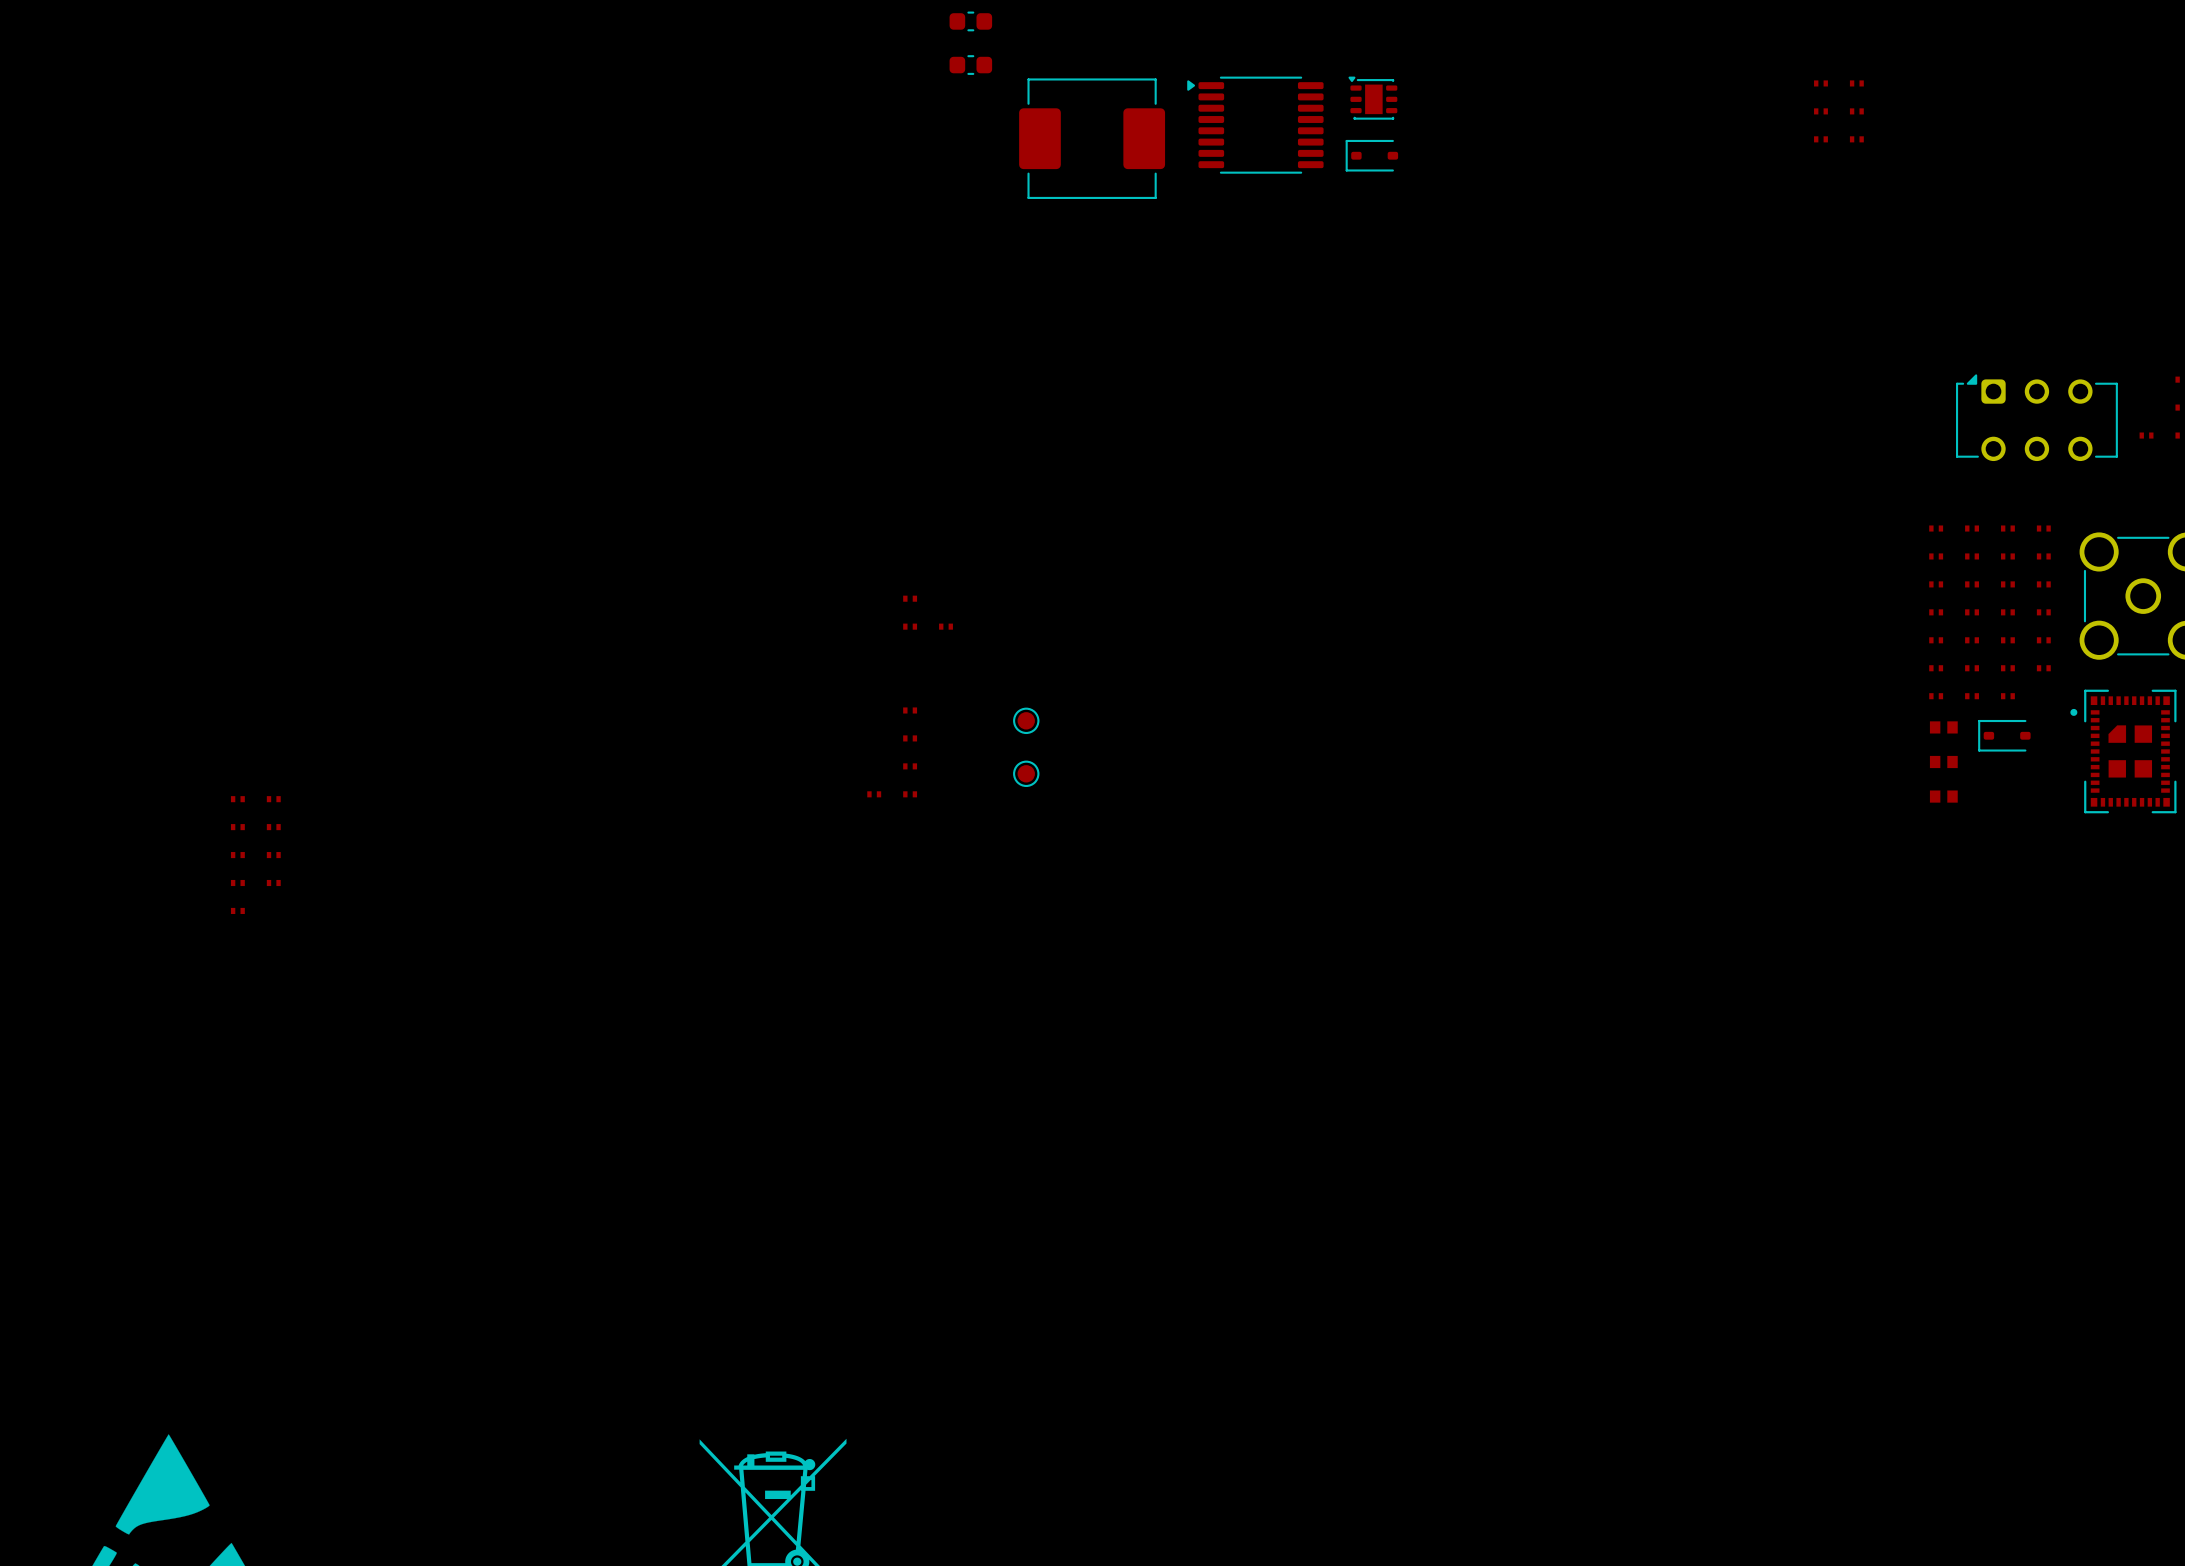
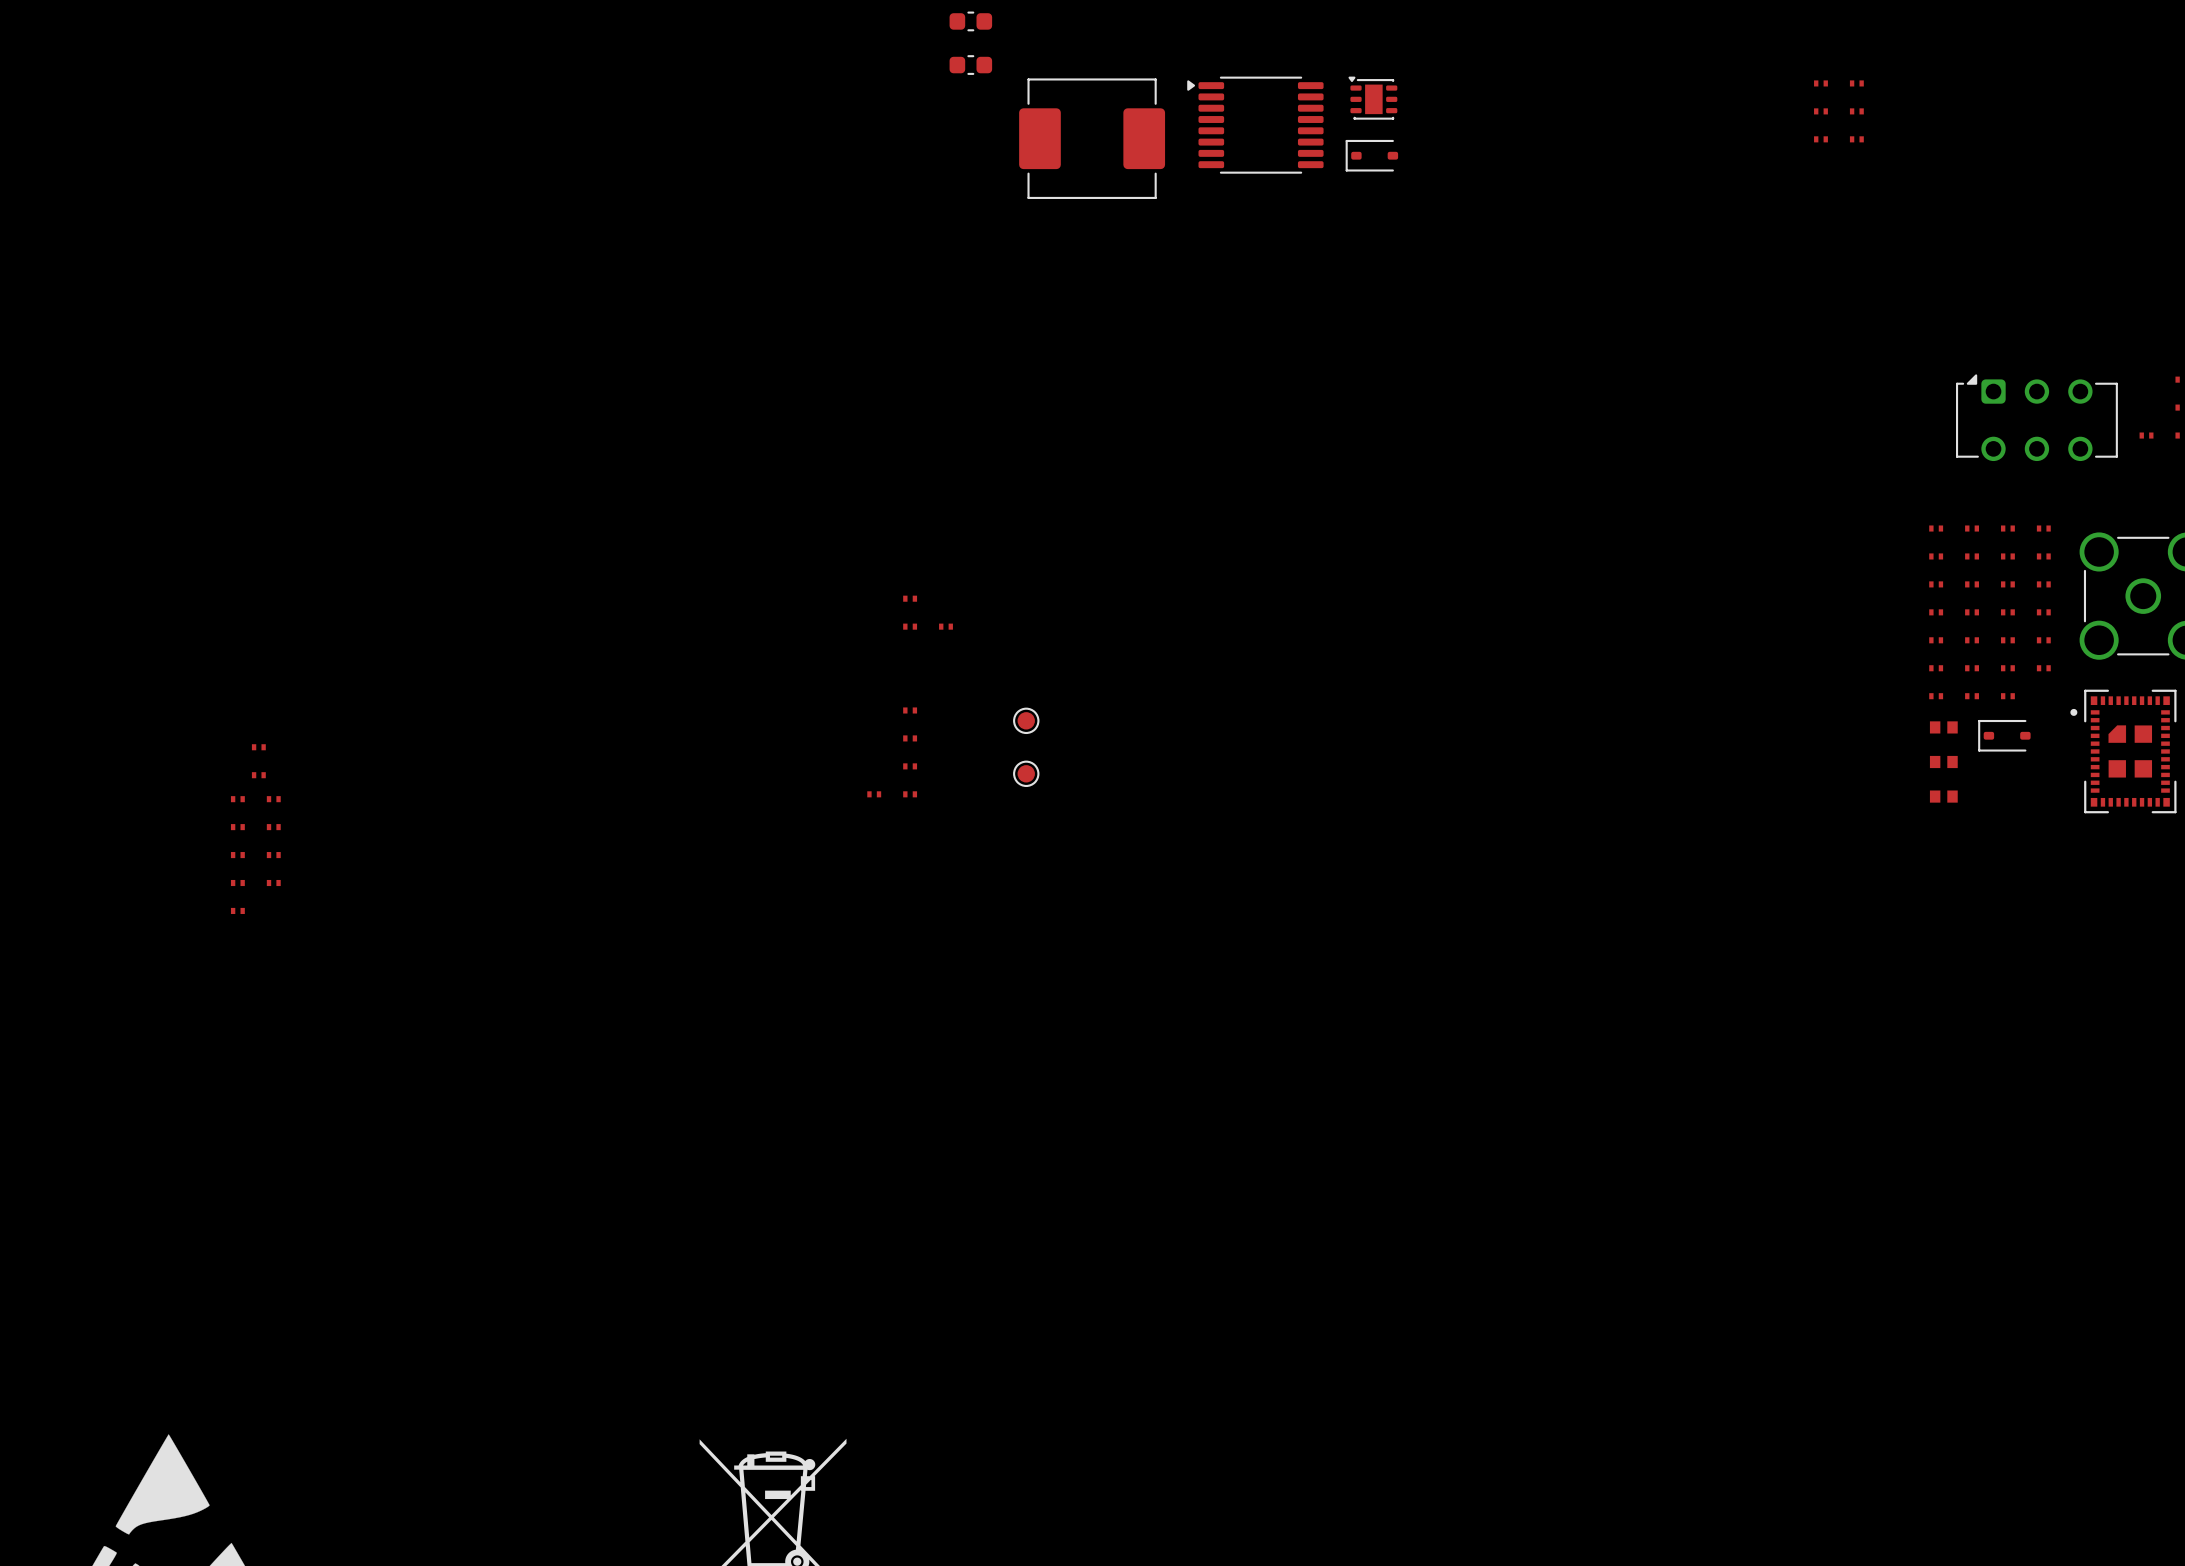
part: none -> (258, 747)
part: none -> (258, 775)

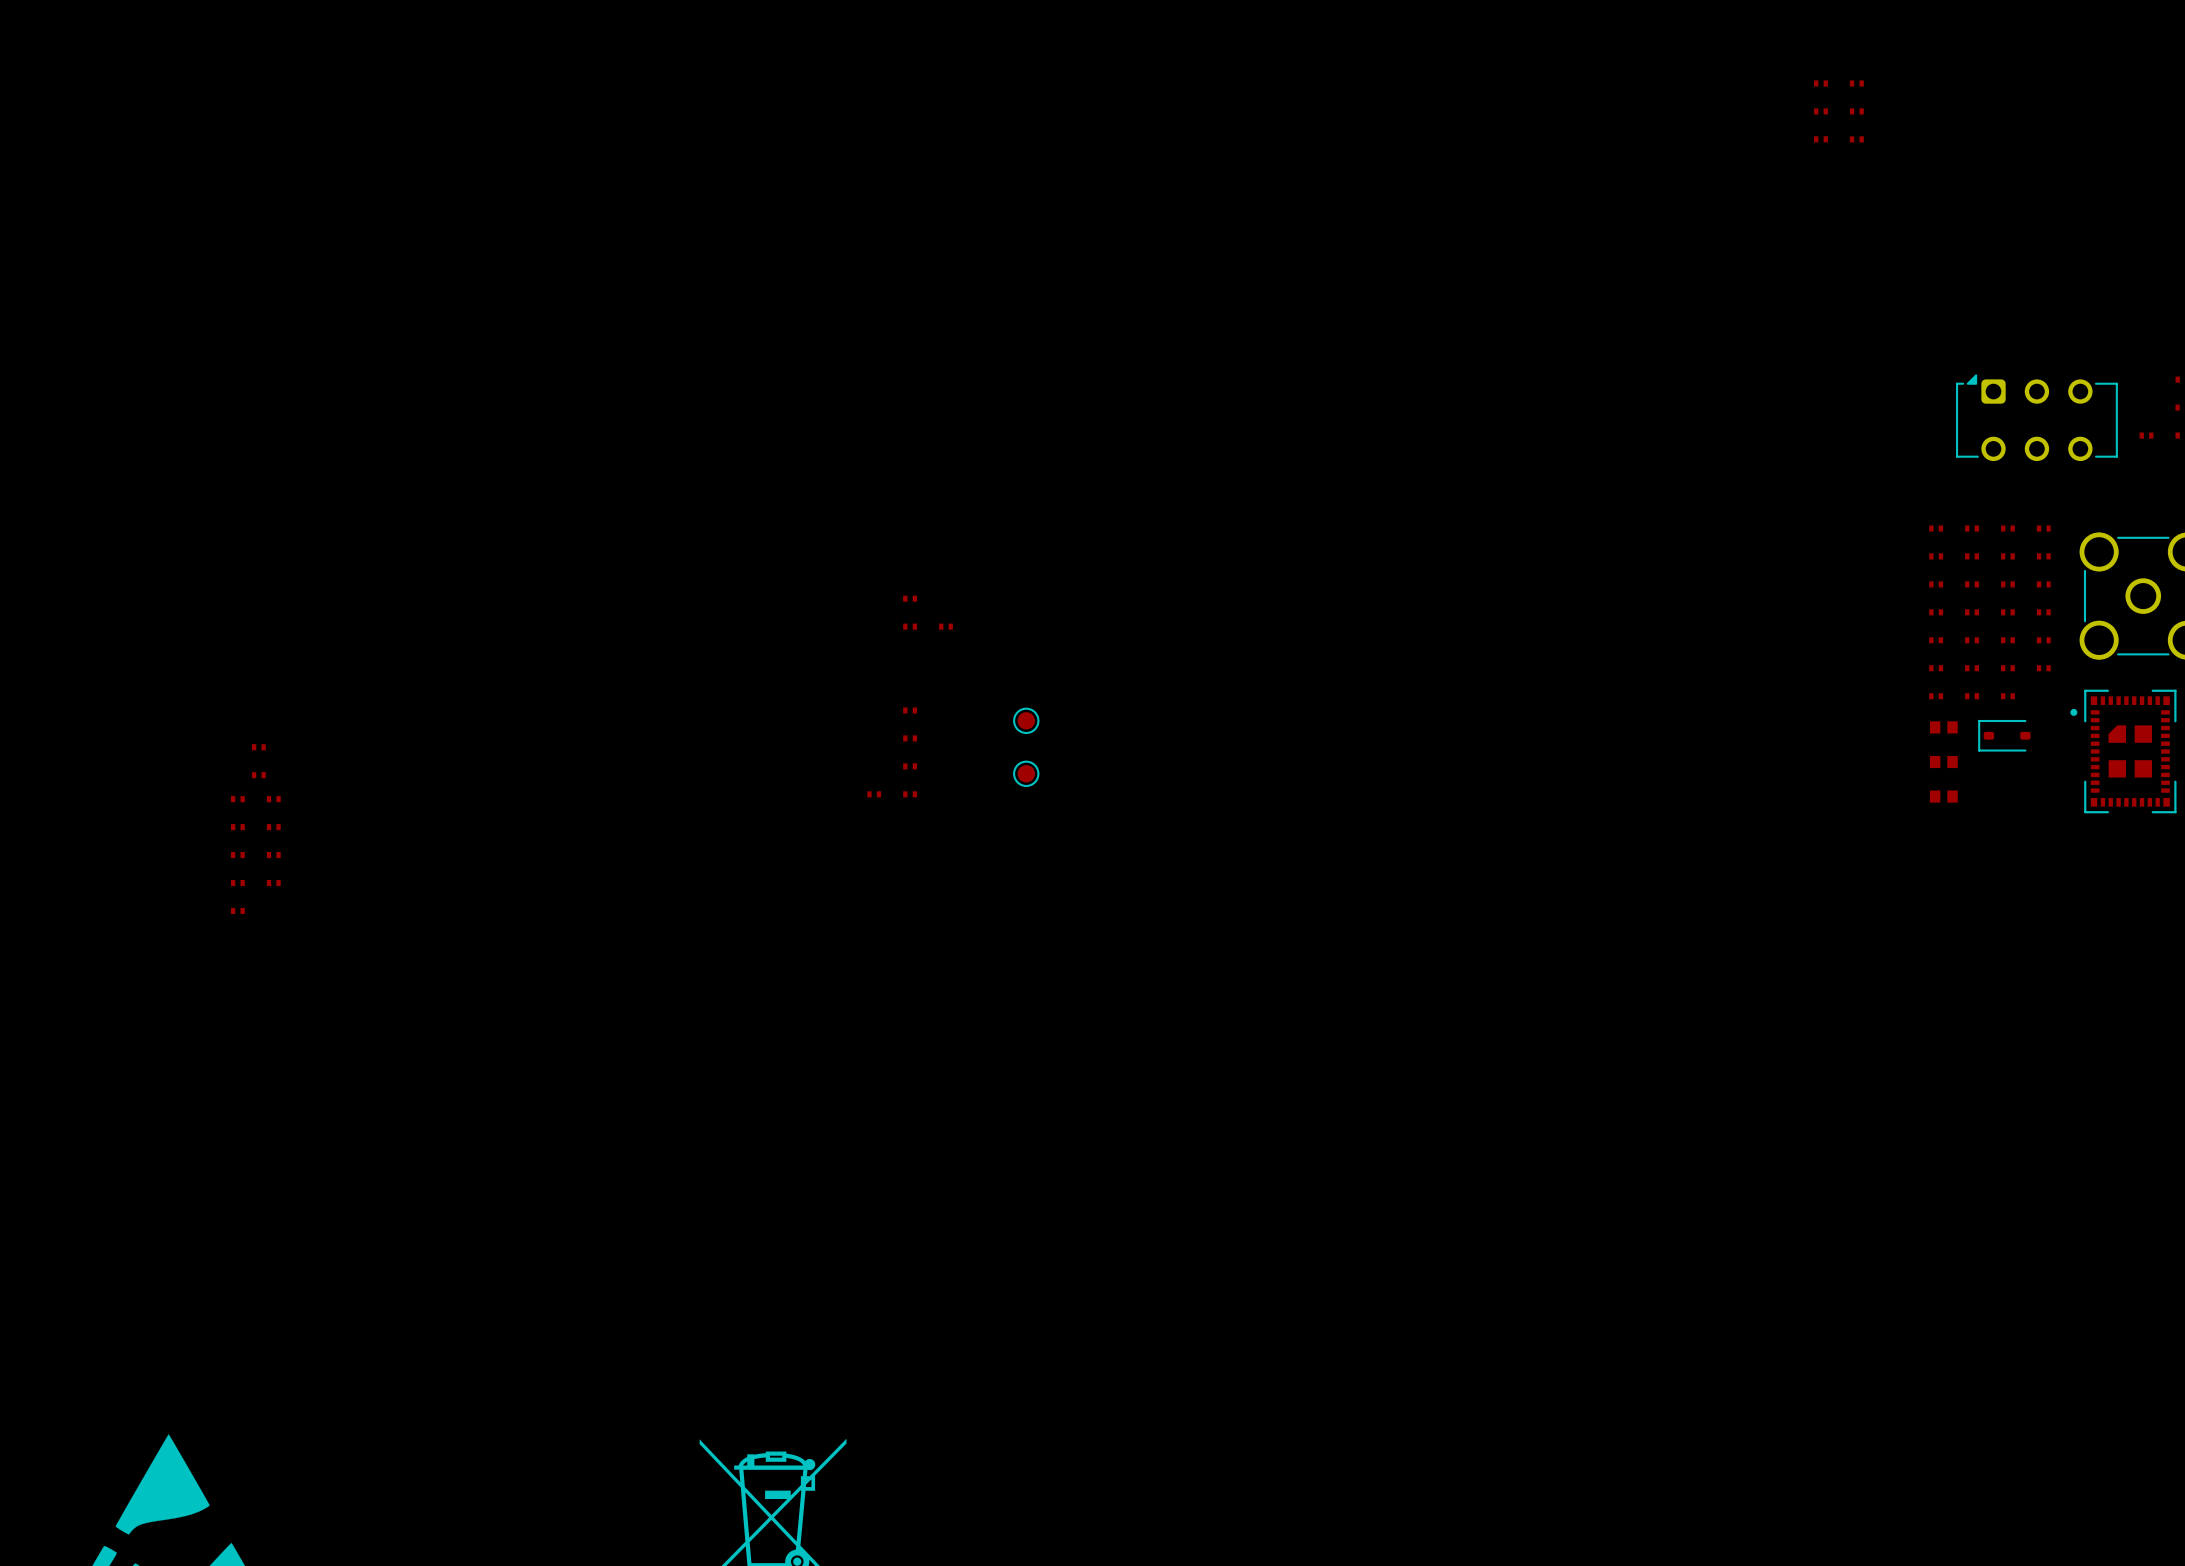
part: (970, 21) -> none
part: (970, 65) -> none
part: (1372, 98) -> none
part: (1255, 125) -> none
part: (1092, 138) -> none
part: (1371, 155) -> none

